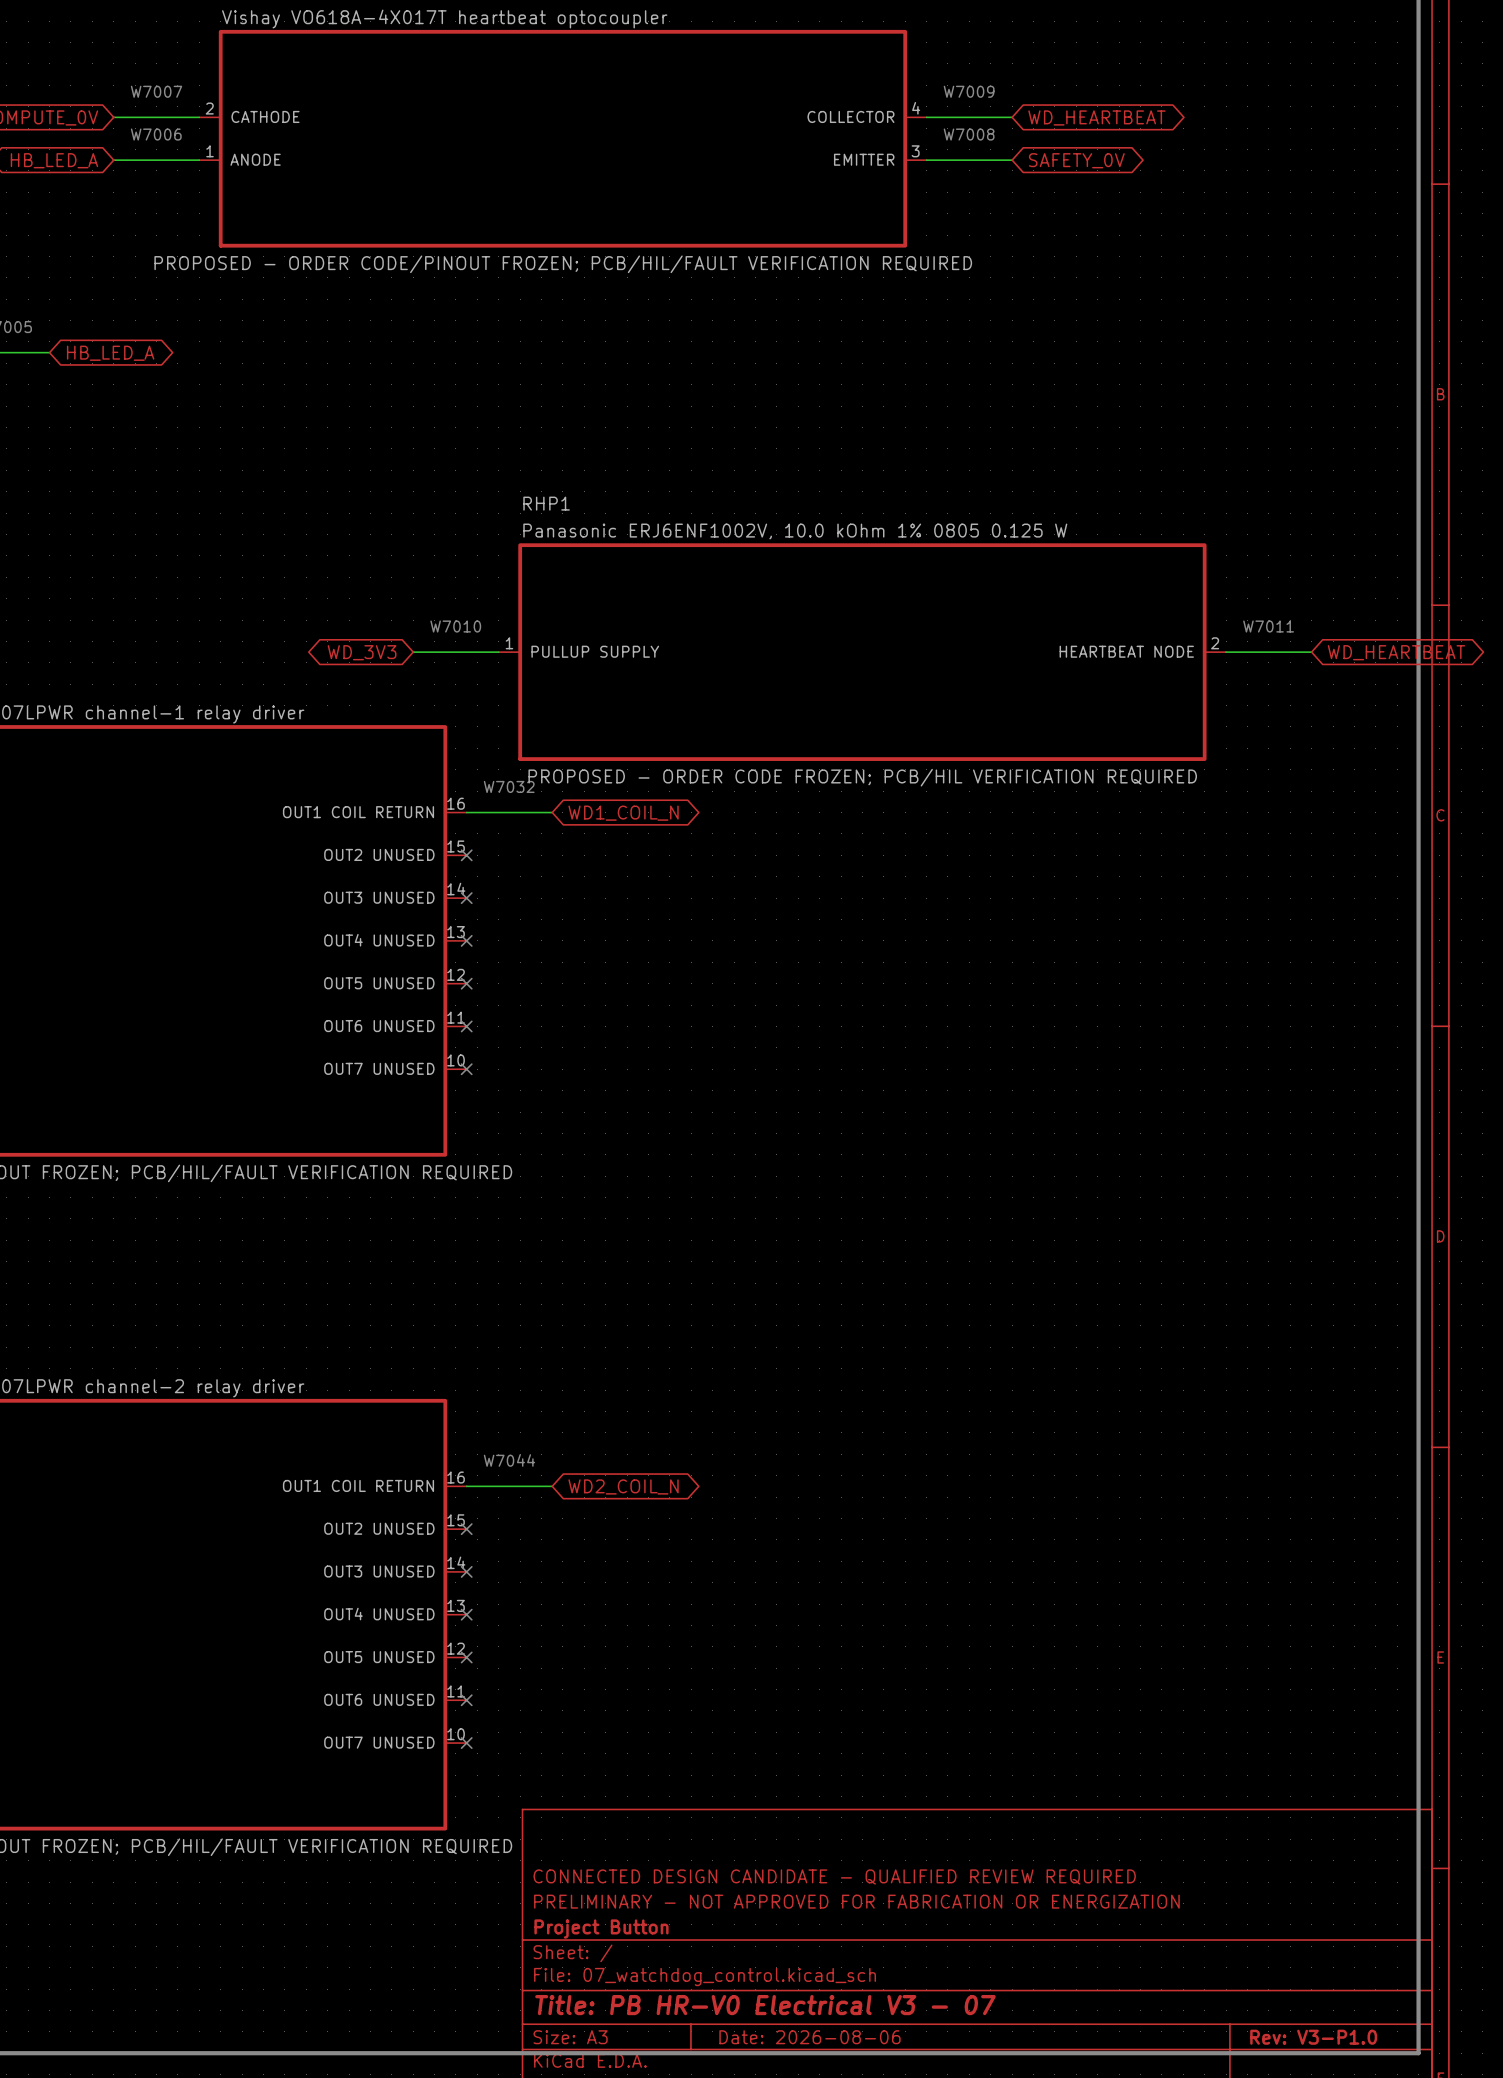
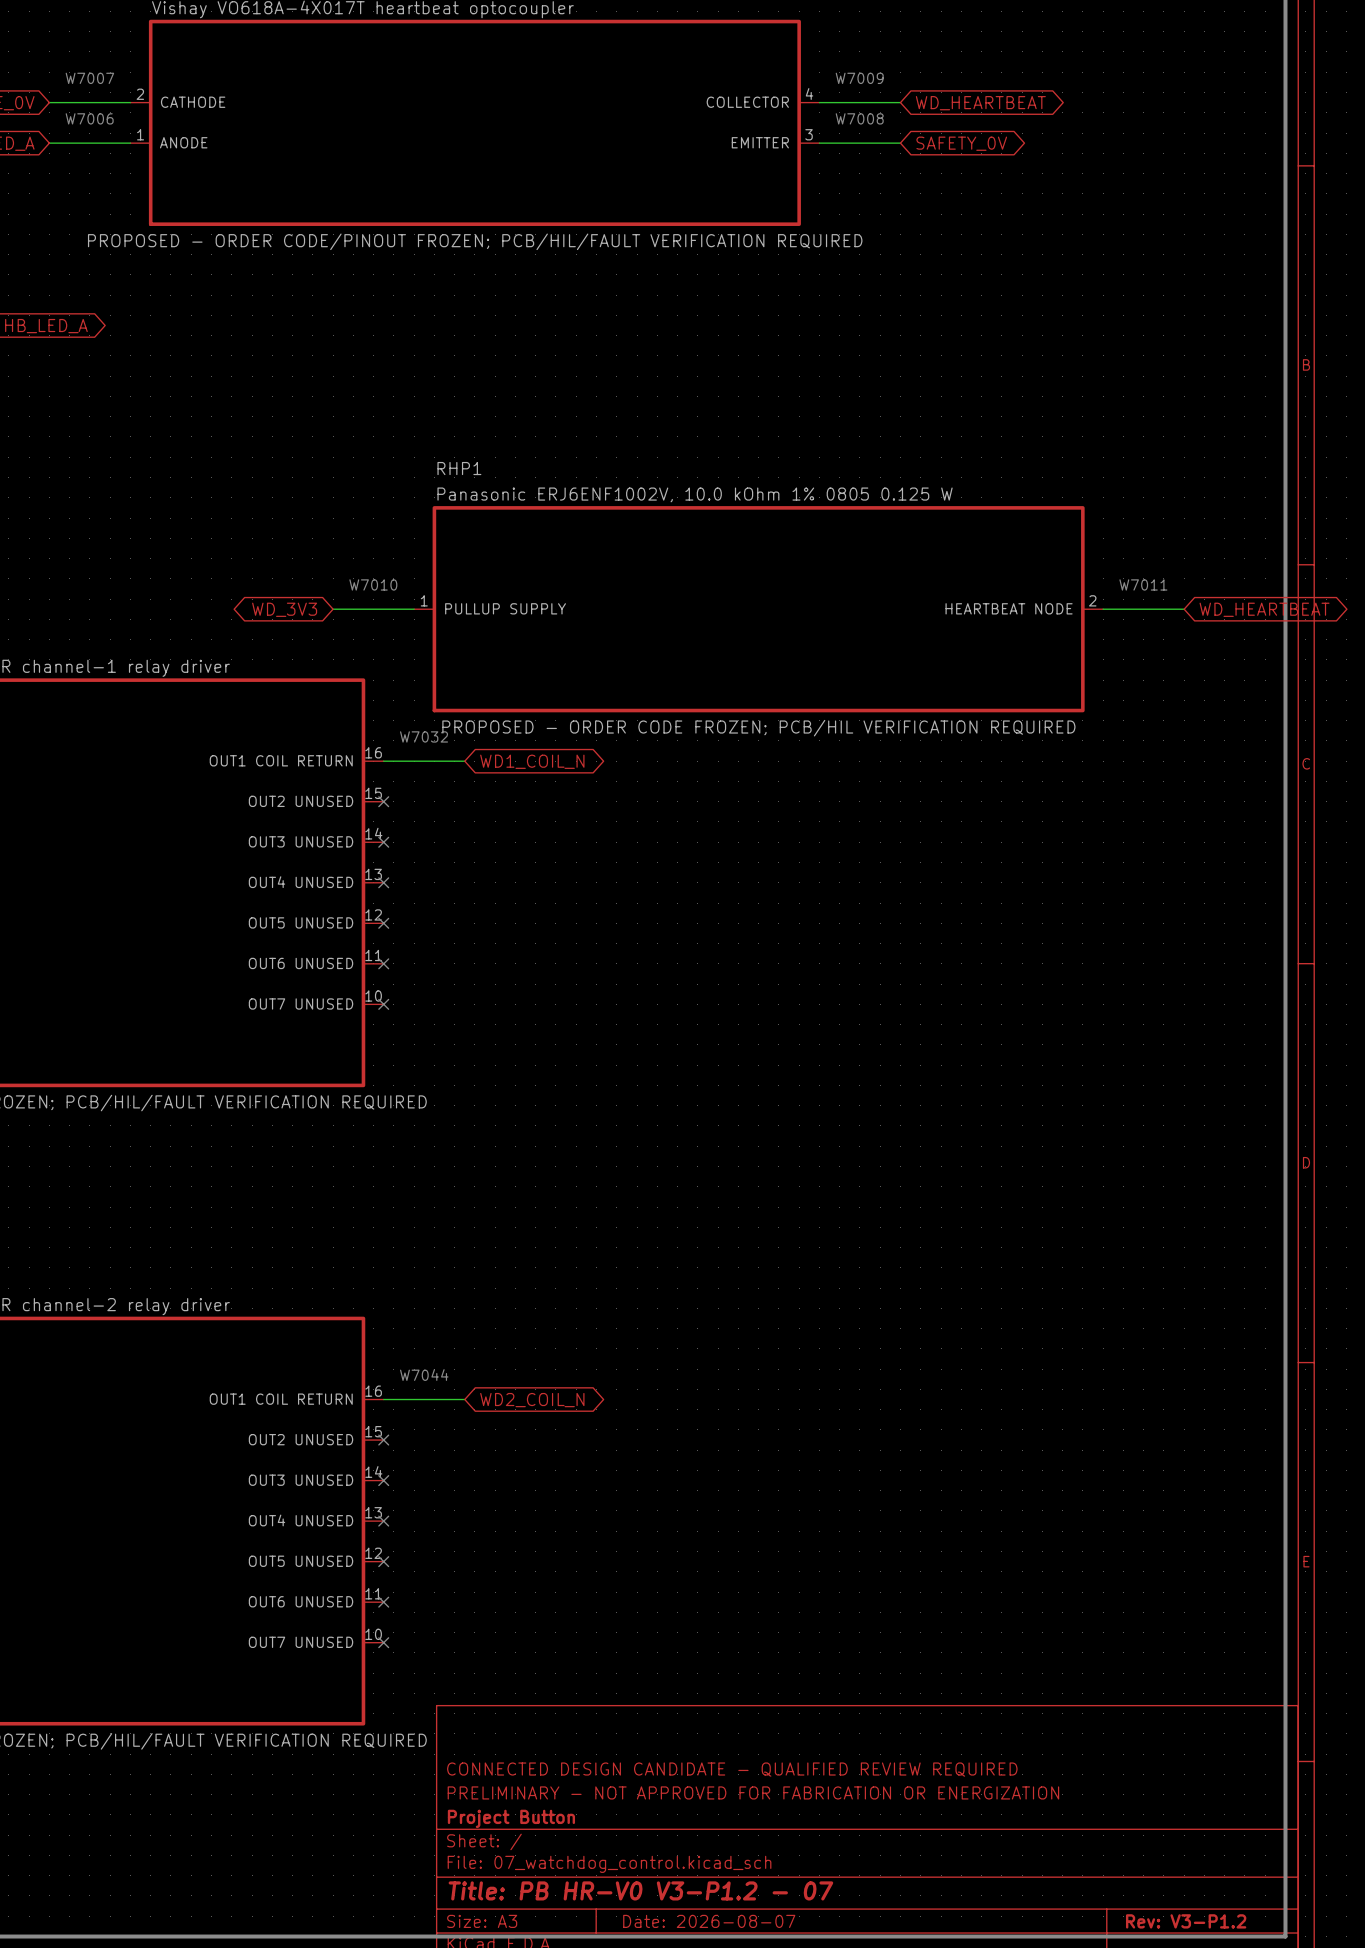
title block: Title: PB HR-V0 Electrical V3 - 07 (765, 2005) -> Title: PB HR-V0 V3-P1.2 - 07 (640, 1890)
title block: Date: 2026-08-06 (810, 2037) -> Date: 2026-08-07 (709, 1921)
title block: Rev: V3-P1.0 (1313, 2037) -> Rev: V3-P1.2 (1186, 1921)

